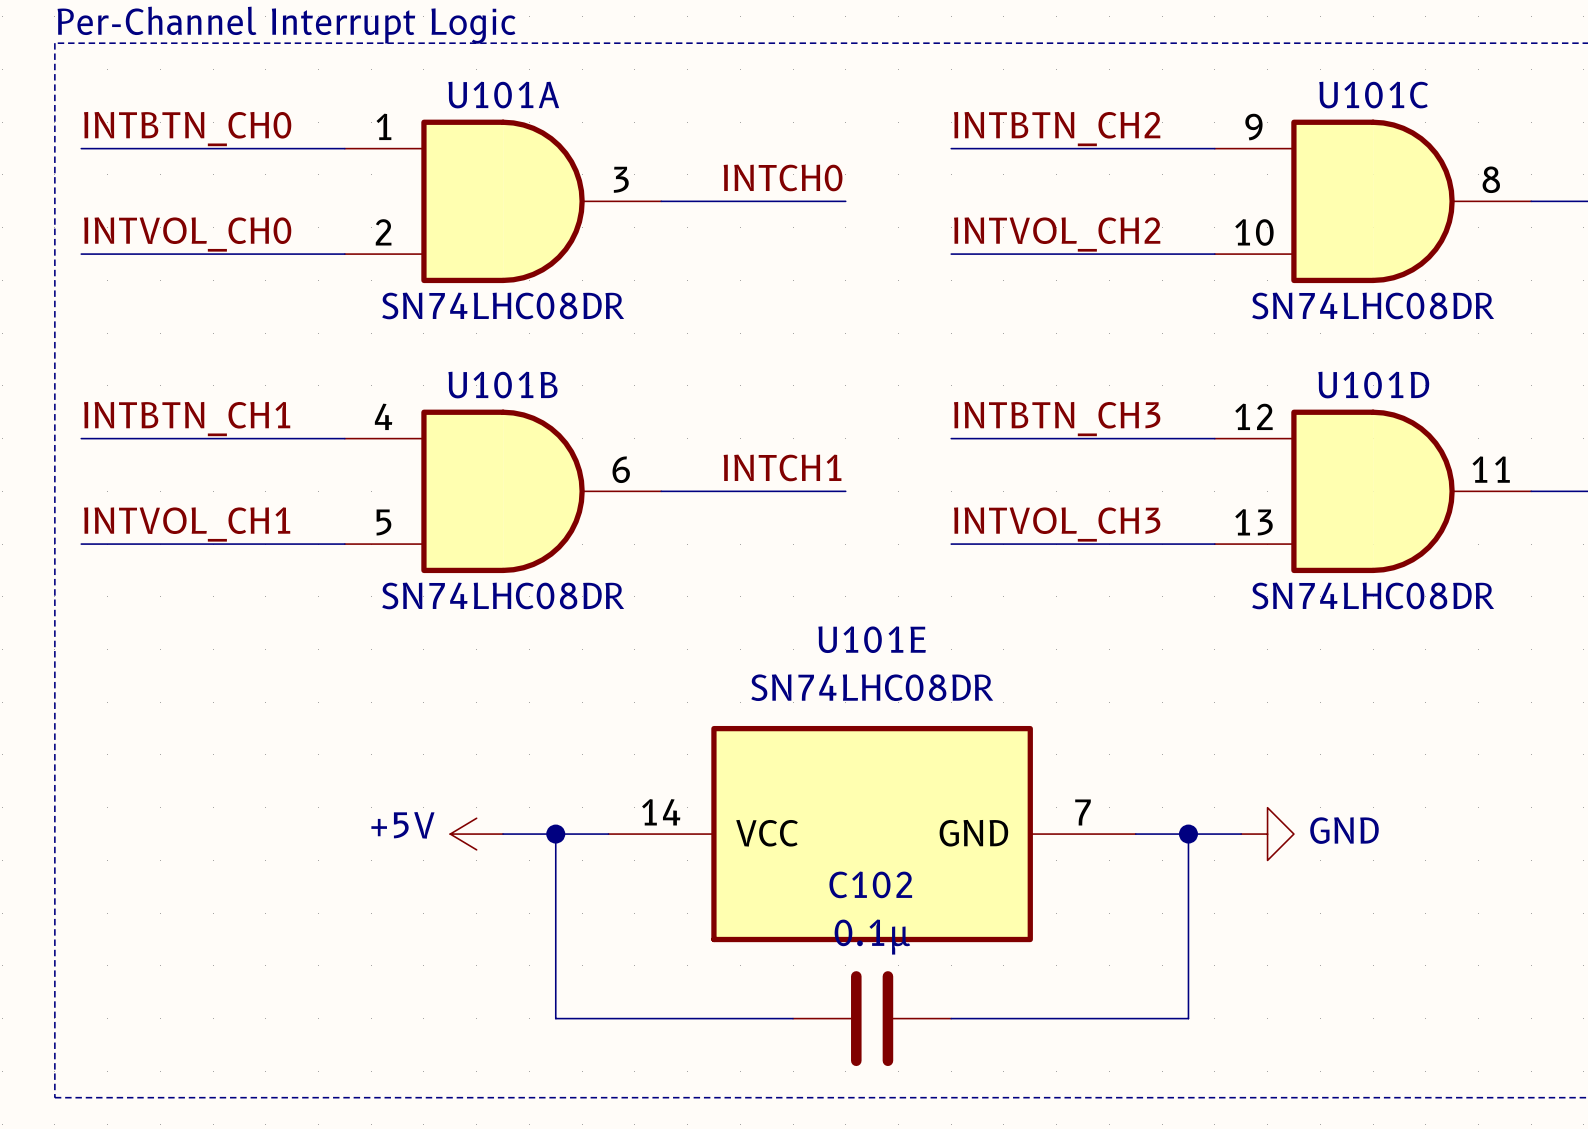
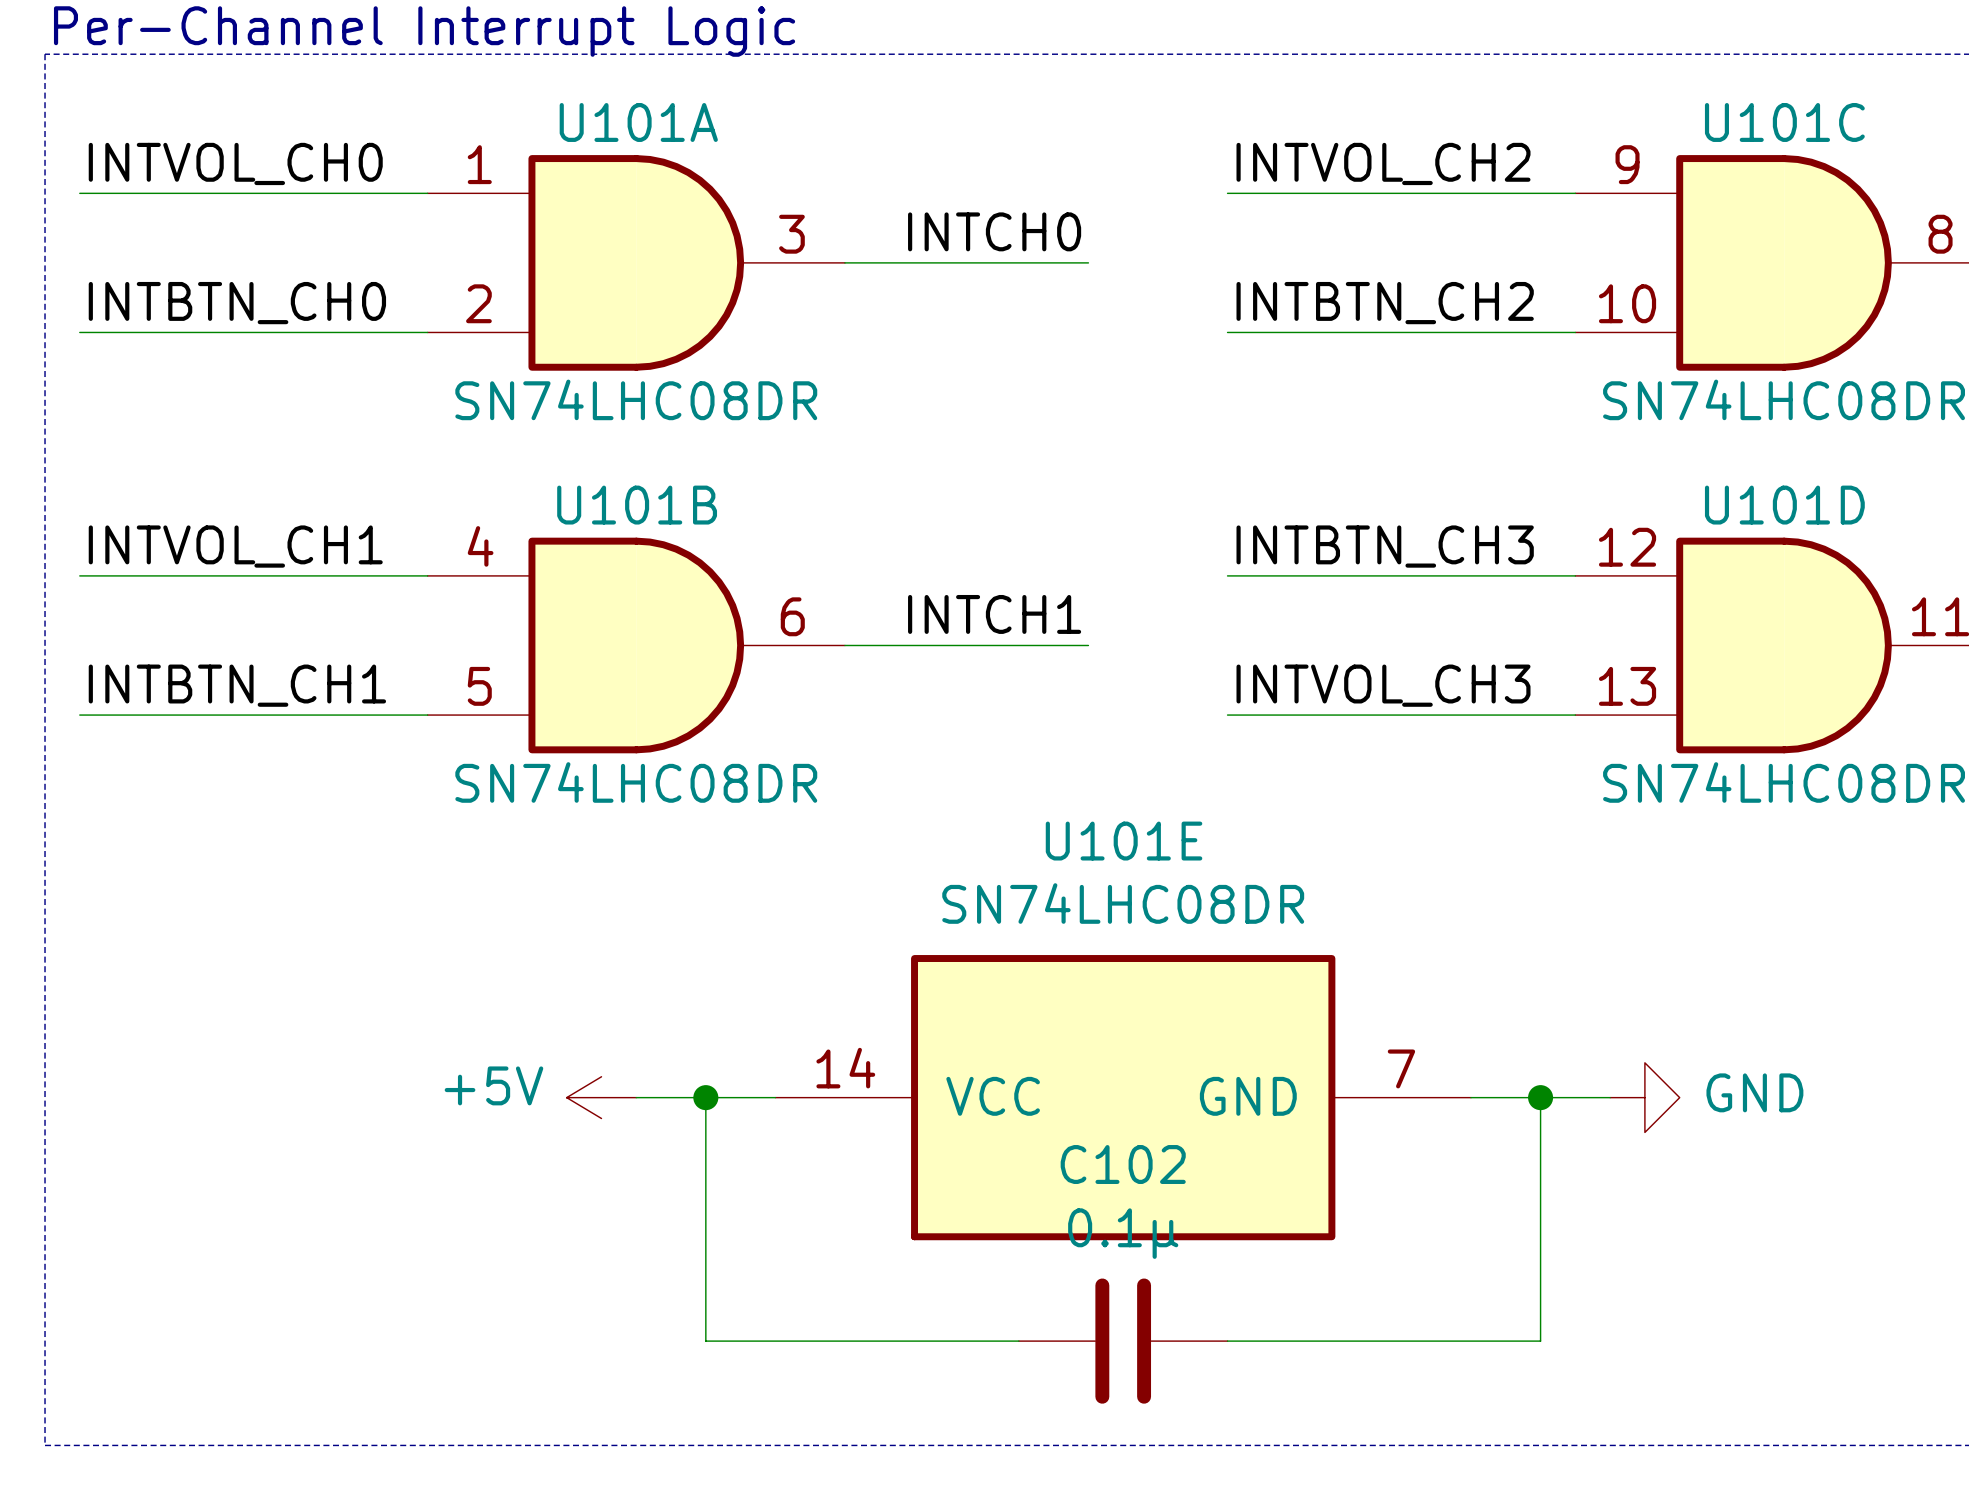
label: INTBTN_CH0 (187, 129) -> INTVOL_CH0 (235, 163)
label: INTBTN_CH2 (1057, 129) -> INTVOL_CH2 (1383, 163)
label: INTVOL_CH0 (187, 234) -> INTBTN_CH0 (237, 303)
label: INTVOL_CH2 (1057, 234) -> INTBTN_CH2 (1385, 303)
label: INTBTN_CH1 (187, 419) -> INTVOL_CH1 (235, 546)
label: INTVOL_CH1 (187, 524) -> INTBTN_CH1 (237, 685)

